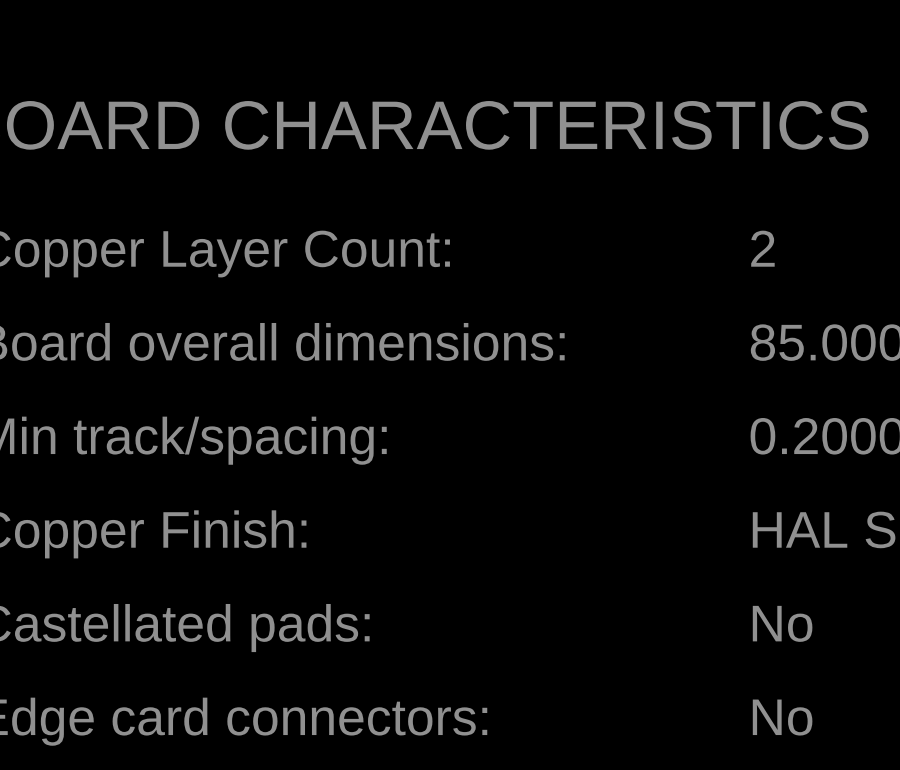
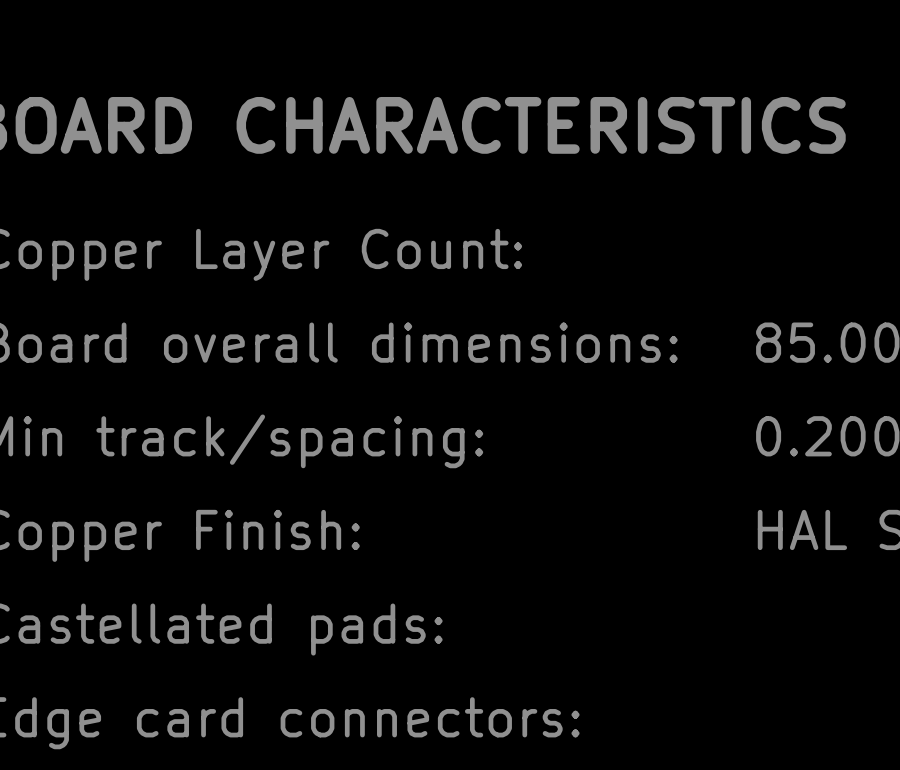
text: 2 (762, 248) -> none
text: No (782, 623) -> none
text: No (782, 717) -> none

